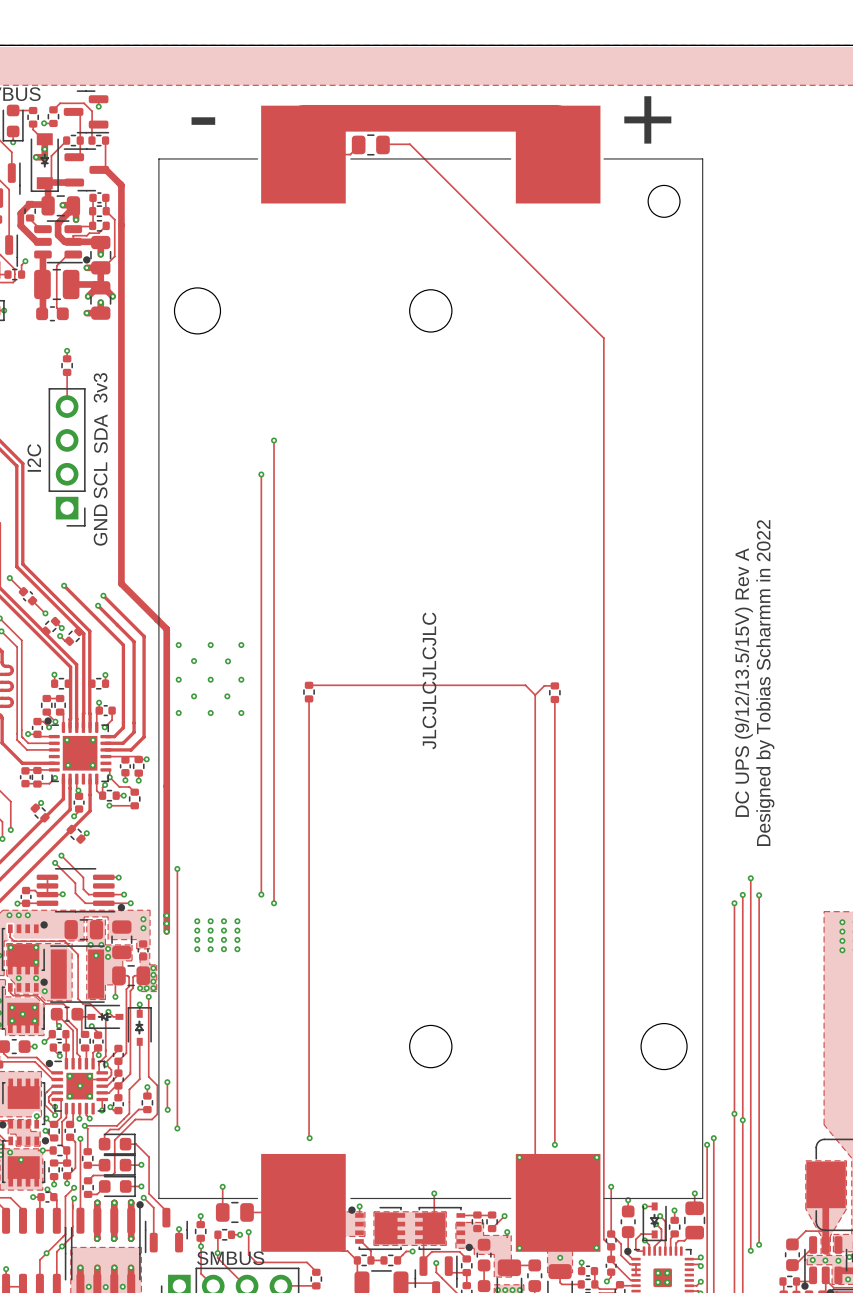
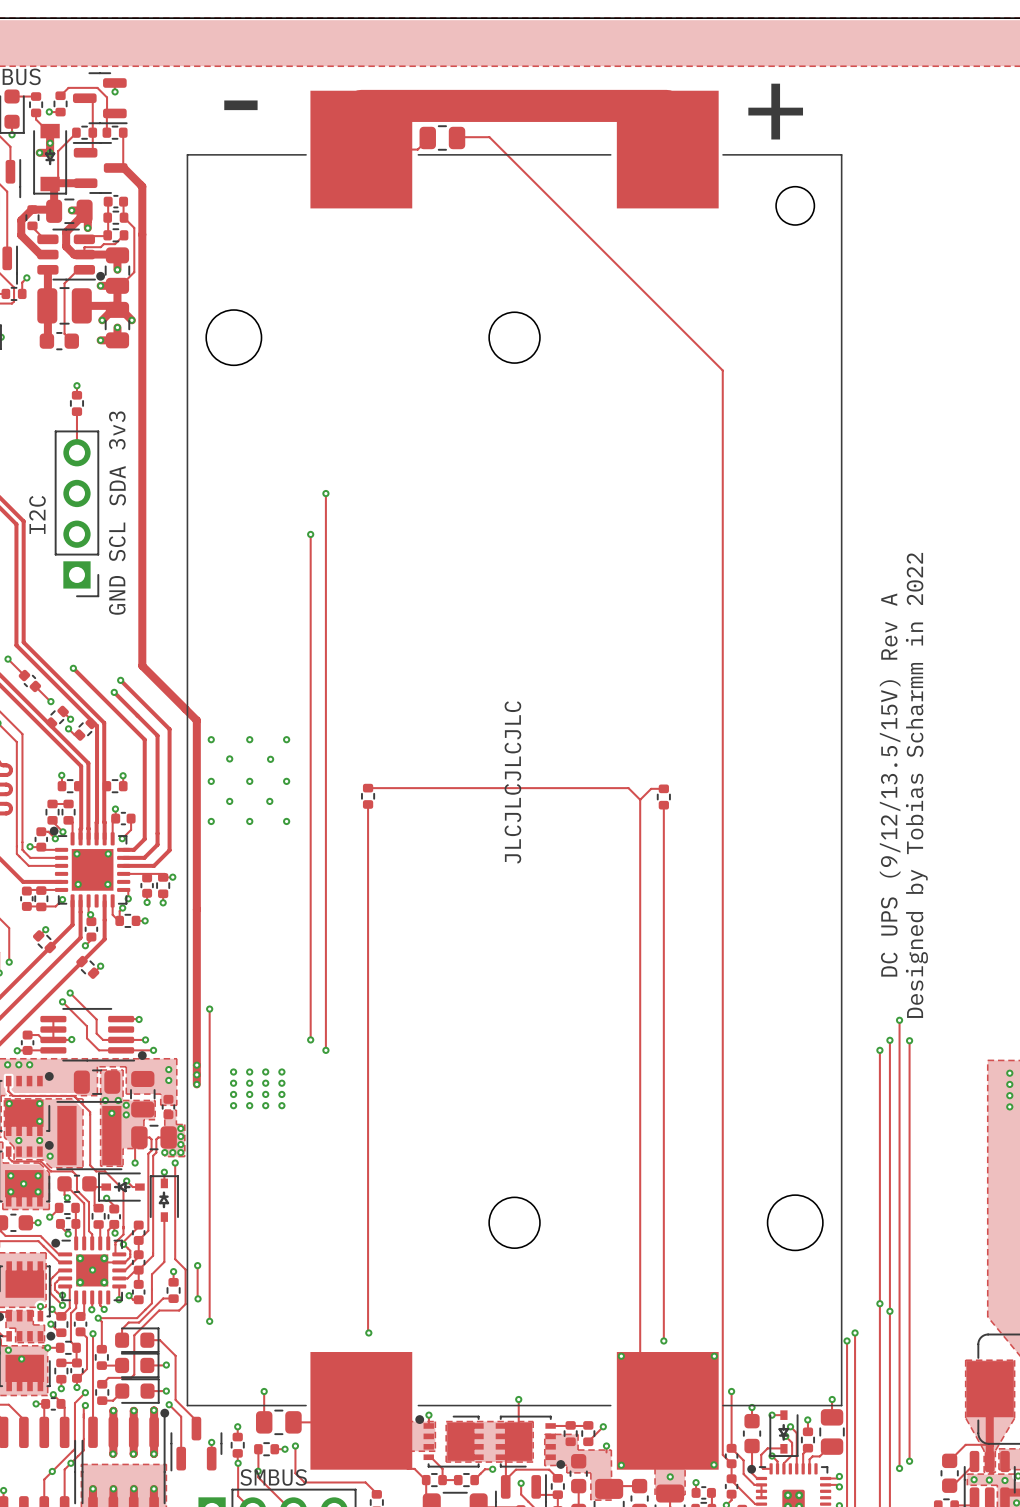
track: (109, 777) (119, 786) (129, 786) (134, 792) -> none
part: (134, 798) -> none
track: (109, 805) (134, 805) -> none
via: (109, 805) -> none

